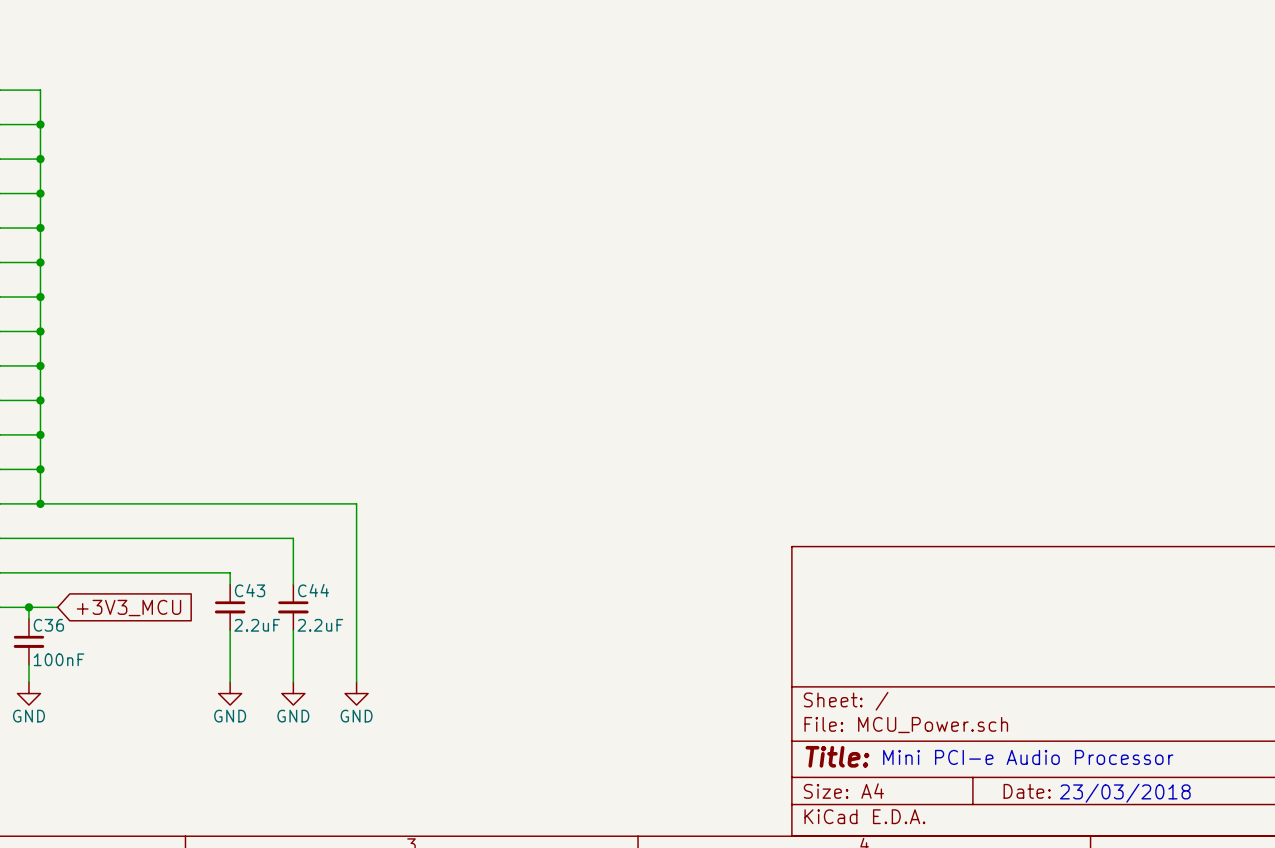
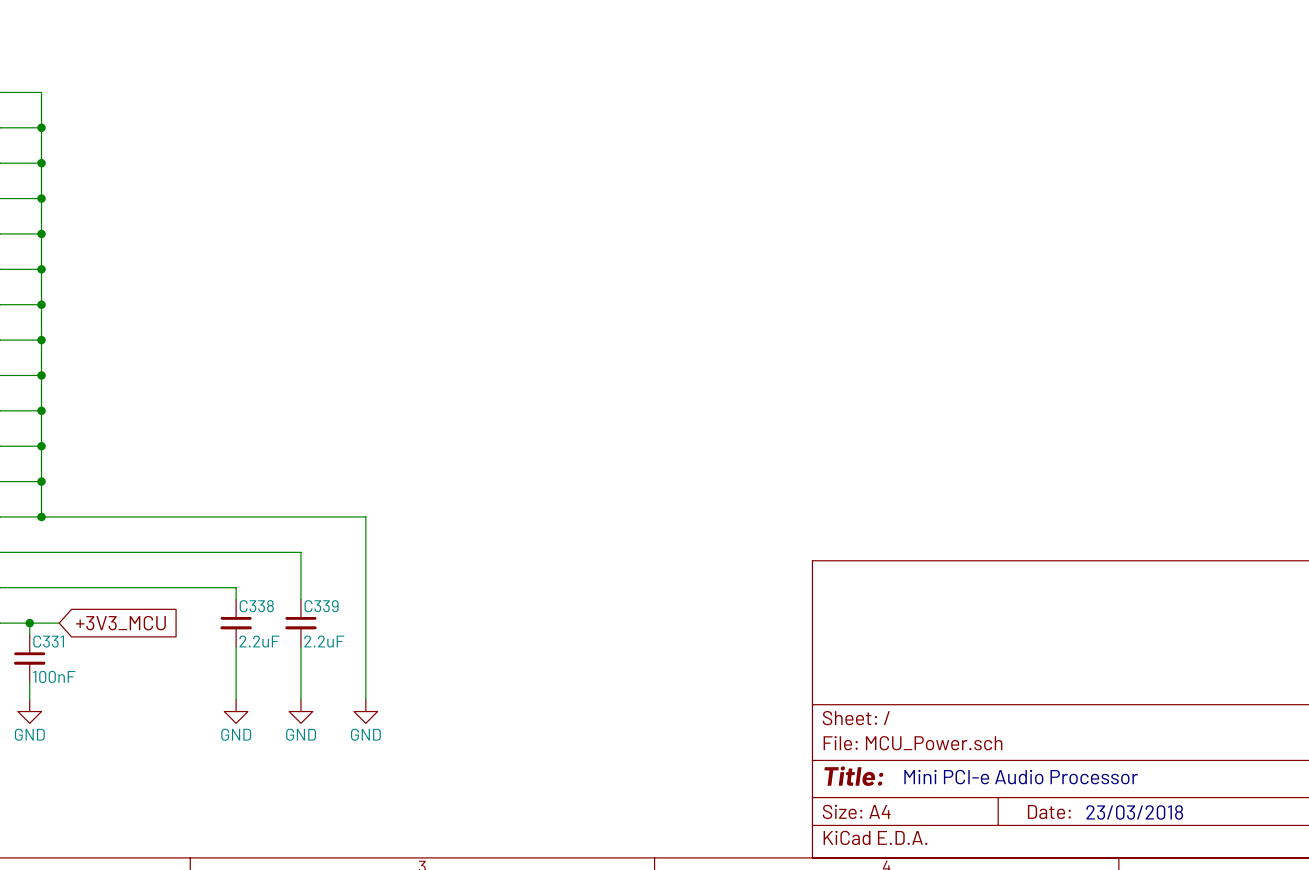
C43 name: C43 (250, 590) -> C338 (256, 606)
C44 name: C44 (313, 590) -> C339 (321, 606)
C36 name: C36 (48, 625) -> C331 (48, 641)

